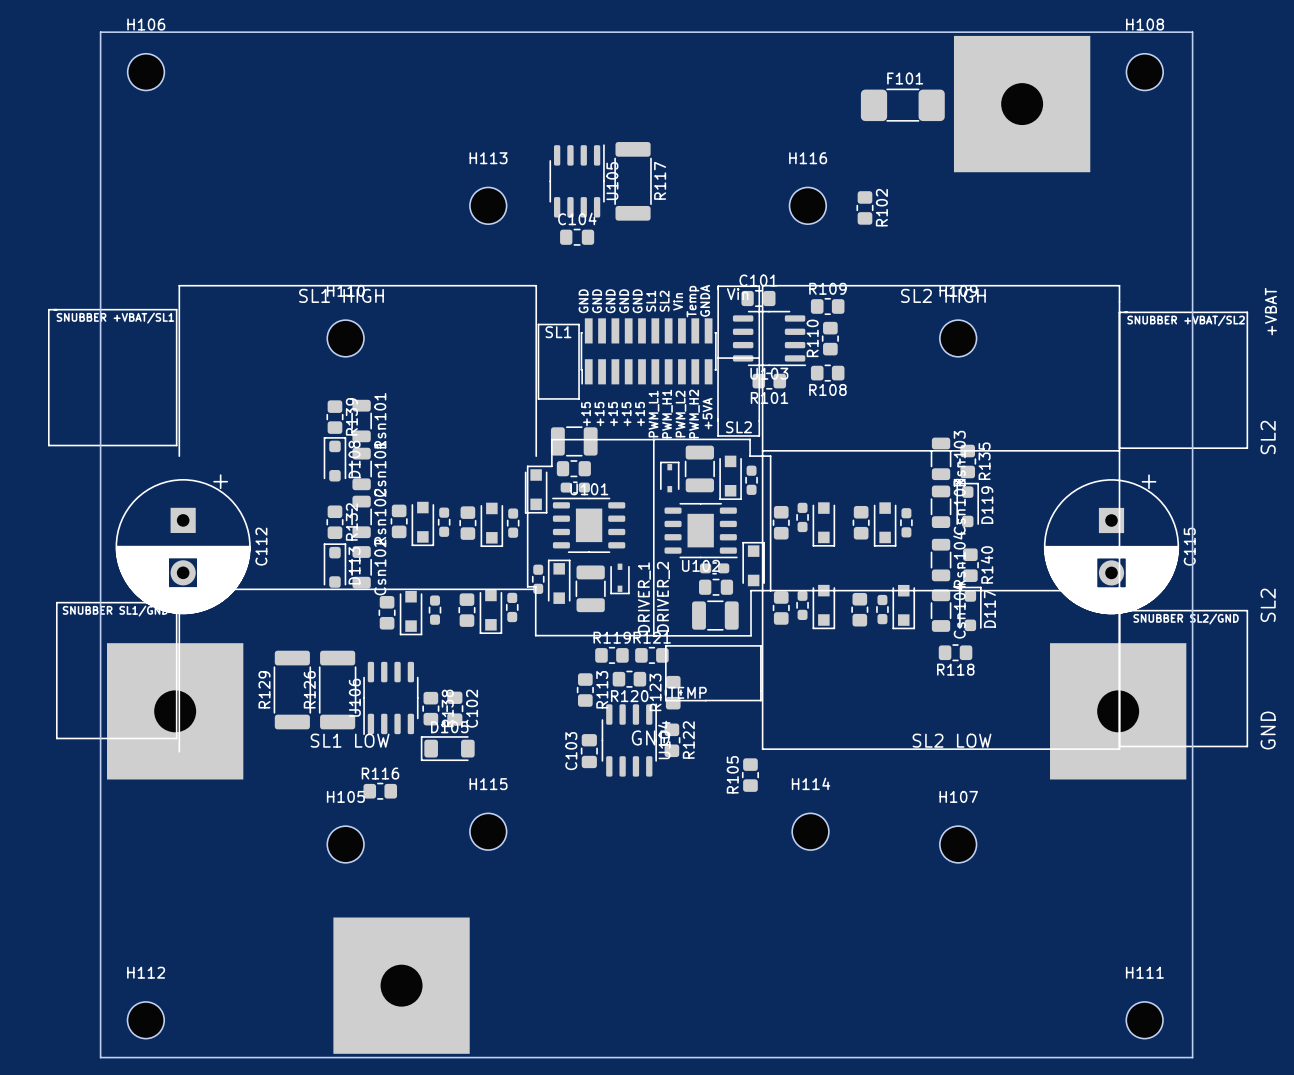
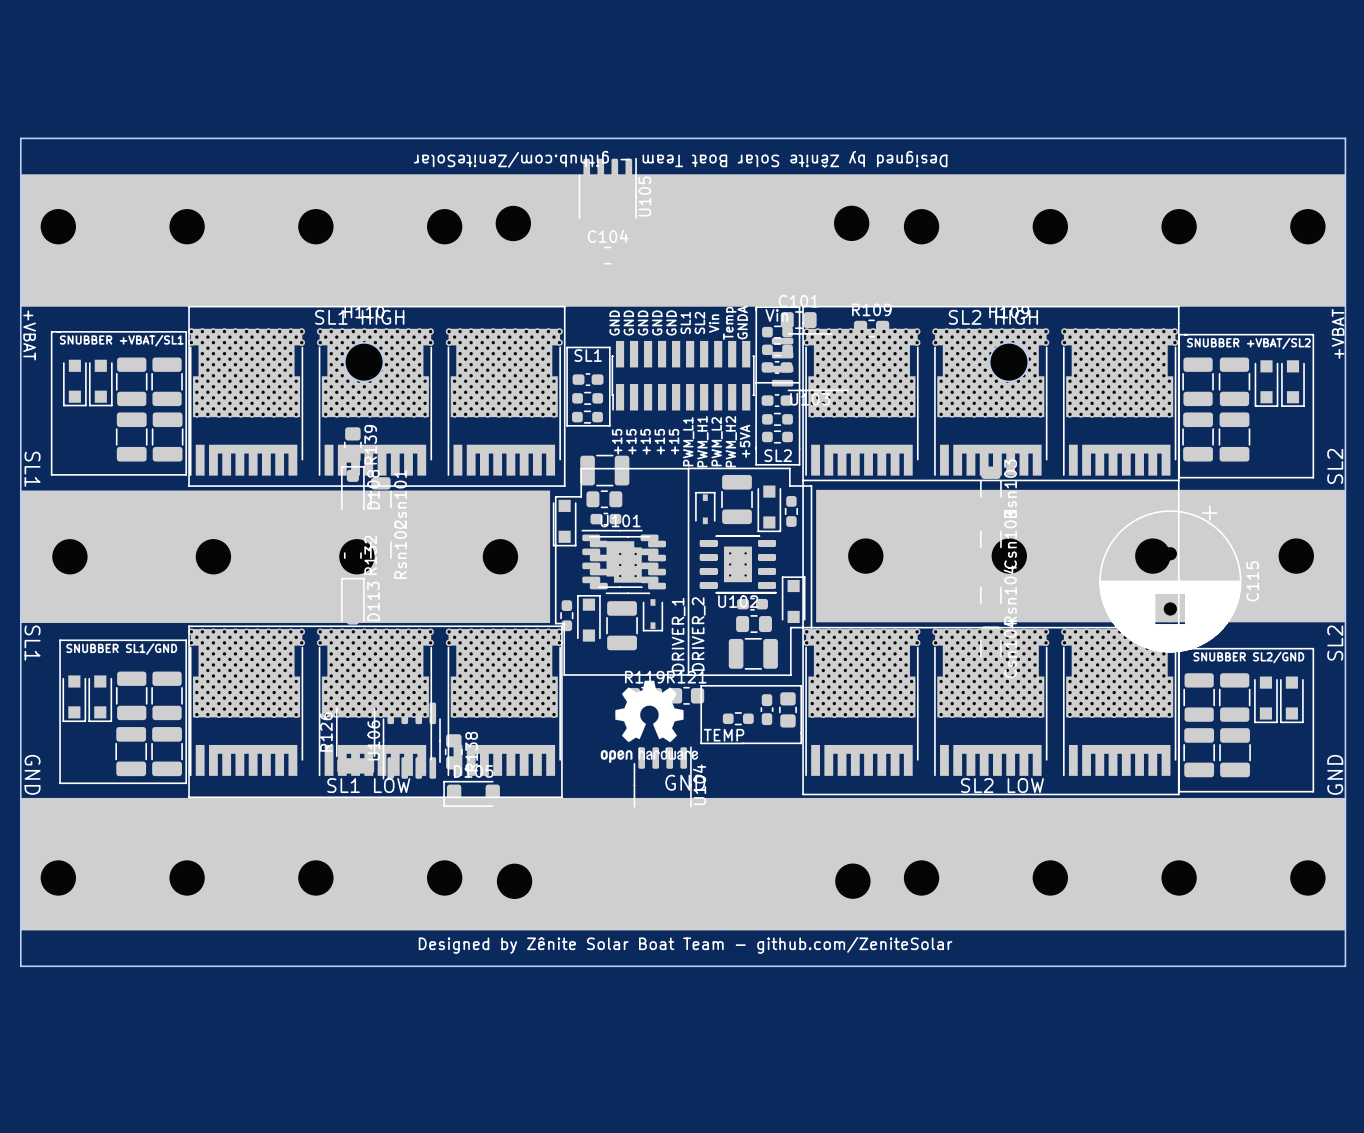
board edge: (100, 32) (1192, 32) (1192, 1057) (100, 1057) (100, 32) -> (20, 138) (20, 966) (1345, 966) (1345, 138) (20, 138)
H106: (146, 72) -> none
H108: (1144, 72) -> none
part: (1022, 104) -> none
F101: (902, 105) -> none
text: none -> Designed by Zênite Solar Boat Team - github.com/ZeniteSolar (680, 159)
R117: (633, 181) -> none
H113: (488, 205) -> none
H116: (807, 205) -> none
R102: (864, 207) -> none
part: none -> (683, 240)
part: none -> (777, 332)
text: none -> +VBAT (29, 335)
part: none -> (777, 349)
R110: (830, 338) -> none
part: none -> (777, 367)
part: none -> (588, 379)
part: none -> (131, 381)
part: none -> (167, 381)
part: none -> (1198, 381)
part: none -> (1234, 381)
part: none -> (74, 382)
part: none -> (100, 382)
part: none -> (1266, 383)
part: none -> (1292, 383)
part: none -> (587, 398)
R108: (827, 373) -> none
part: none -> (777, 400)
part: none -> (246, 402)
part: none -> (375, 402)
part: none -> (504, 402)
part: none -> (861, 402)
part: none -> (990, 402)
part: none -> (1119, 402)
R101: (769, 381) -> none
part: none -> (587, 417)
part: none -> (777, 419)
part: none -> (131, 436)
part: none -> (167, 436)
part: none -> (777, 436)
part: none -> (1198, 436)
part: none -> (1234, 436)
Rsn101: (361, 421) -> none
text: none -> SL1 (32, 469)
line: none -> (189, 486) (564, 486)
R135: (967, 461) -> none
D119: (967, 505) -> none
part: (802, 517) -> none
part: (399, 521) -> none
part: (444, 522) -> none
part: (781, 522) -> none
part: (861, 522) -> none
part: (906, 522) -> none
part: none -> (1081, 556)
part: none -> (285, 556)
part: (422, 523) -> none
part: (467, 523) -> none
part: (513, 523) -> none
part: (491, 524) -> none
part: (823, 524) -> none
part: (885, 524) -> none
part: none -> (738, 564)
part: none -> (627, 565)
C112: (183, 544) -> none
R140: (970, 565) -> none
Csn102: (361, 567) -> none
line: none -> (561, 626) (561, 797) (189, 797)
text: none -> SL1 (32, 643)
part: (802, 605) -> none
part: (823, 606) -> none
part: (512, 607) -> none
part: (781, 607) -> none
part: (903, 607) -> none
D117: (970, 608) -> none
part: (859, 609) -> none
part: (882, 609) -> none
part: (435, 610) -> none
part: (466, 610) -> none
part: (490, 611) -> none
part: (387, 612) -> none
part: (411, 613) -> none
drawing: none -> [600, 680, 699, 764]
R118: (955, 652) -> none
part: none -> (131, 695)
part: none -> (167, 695)
part: none -> (1199, 697)
part: none -> (1234, 697)
part: none -> (74, 698)
part: none -> (100, 698)
part: none -> (1265, 699)
part: none -> (1291, 699)
part: none -> (246, 702)
part: none -> (375, 702)
part: none -> (504, 702)
part: none -> (861, 702)
part: none -> (990, 702)
part: none -> (1119, 702)
part: none -> (767, 709)
part: none -> (787, 709)
part: none -> (738, 718)
R120: (629, 679) -> none
R129: (292, 690) -> none
R113: (585, 690) -> none
R123: (673, 692) -> none
part: none -> (131, 751)
part: none -> (167, 751)
C102: (454, 708) -> none
part: none -> (1199, 752)
part: none -> (1235, 752)
part: (175, 711) -> none
part: (1118, 711) -> none
text: none -> GND (32, 774)
R122: (671, 740) -> none
C103: (589, 751) -> none
R105: (750, 775) -> none
R116: (380, 791) -> none
part: none -> (683, 864)
H115: (488, 831) -> none
H114: (810, 831) -> none
H105: (345, 844) -> none
H107: (958, 844) -> none
text: none -> Designed by Zênite Solar Boat Team - github.com/ZeniteSolar (685, 945)
part: (401, 985) -> none
H112: (145, 1020) -> none
H111: (1144, 1020) -> none

